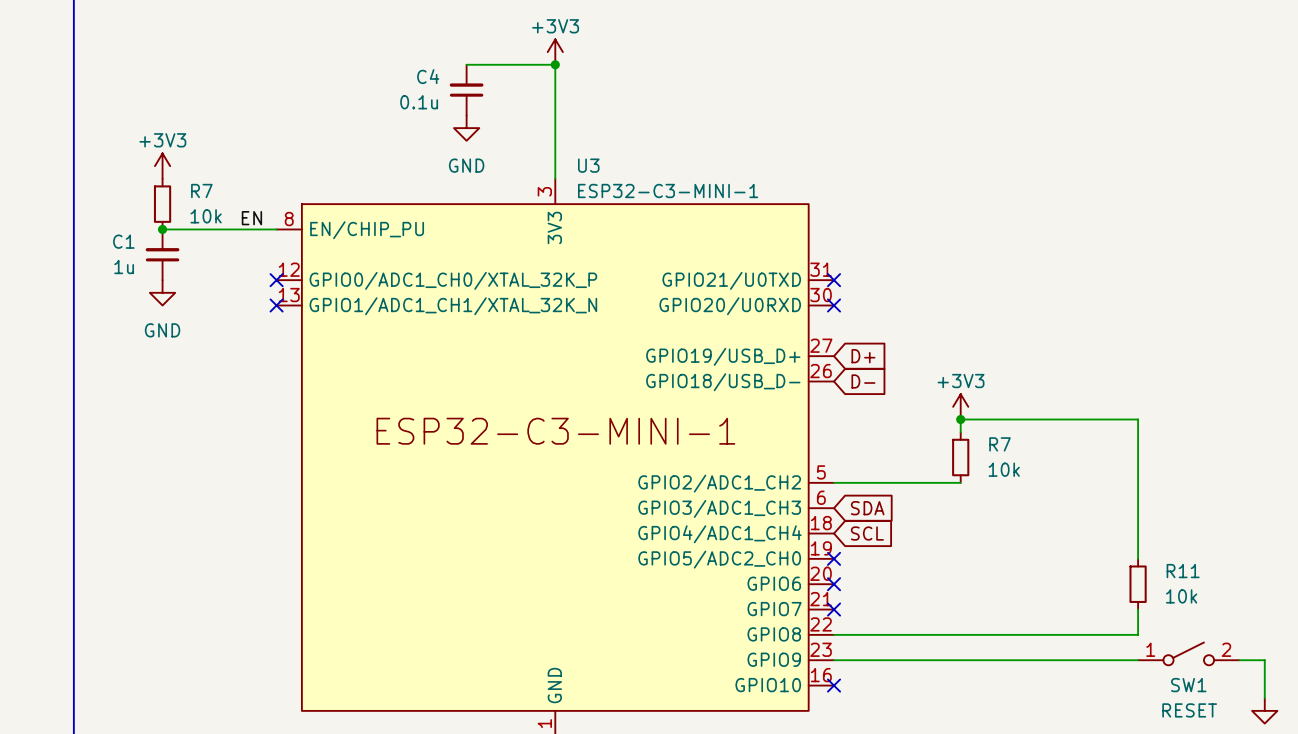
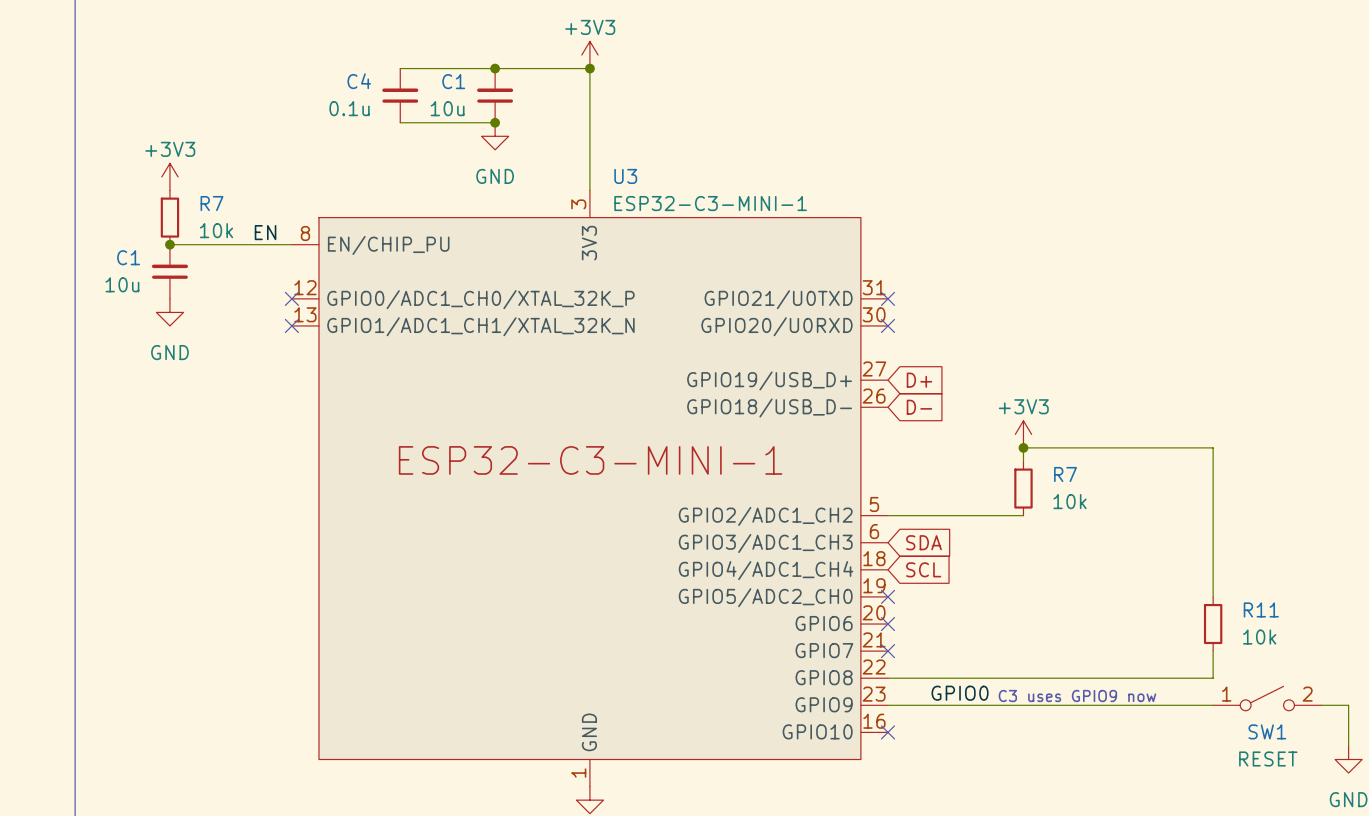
wire: none -> (400, 68) (495, 68)
junction: none -> (495, 68)
C4 name: C4 (428, 76) -> C1 (453, 81)
C4: none -> 0.1u (400, 95)
C4 value: 0.1u (419, 102) -> 10u (447, 108)
wire: none -> (400, 122) (495, 122)
junction: none -> (495, 122)
C1 value: 1u (124, 267) -> 10u (122, 284)
label: none -> GPIO0 (960, 693)
text: none -> C3 uses GPIO9 now (1077, 696)

